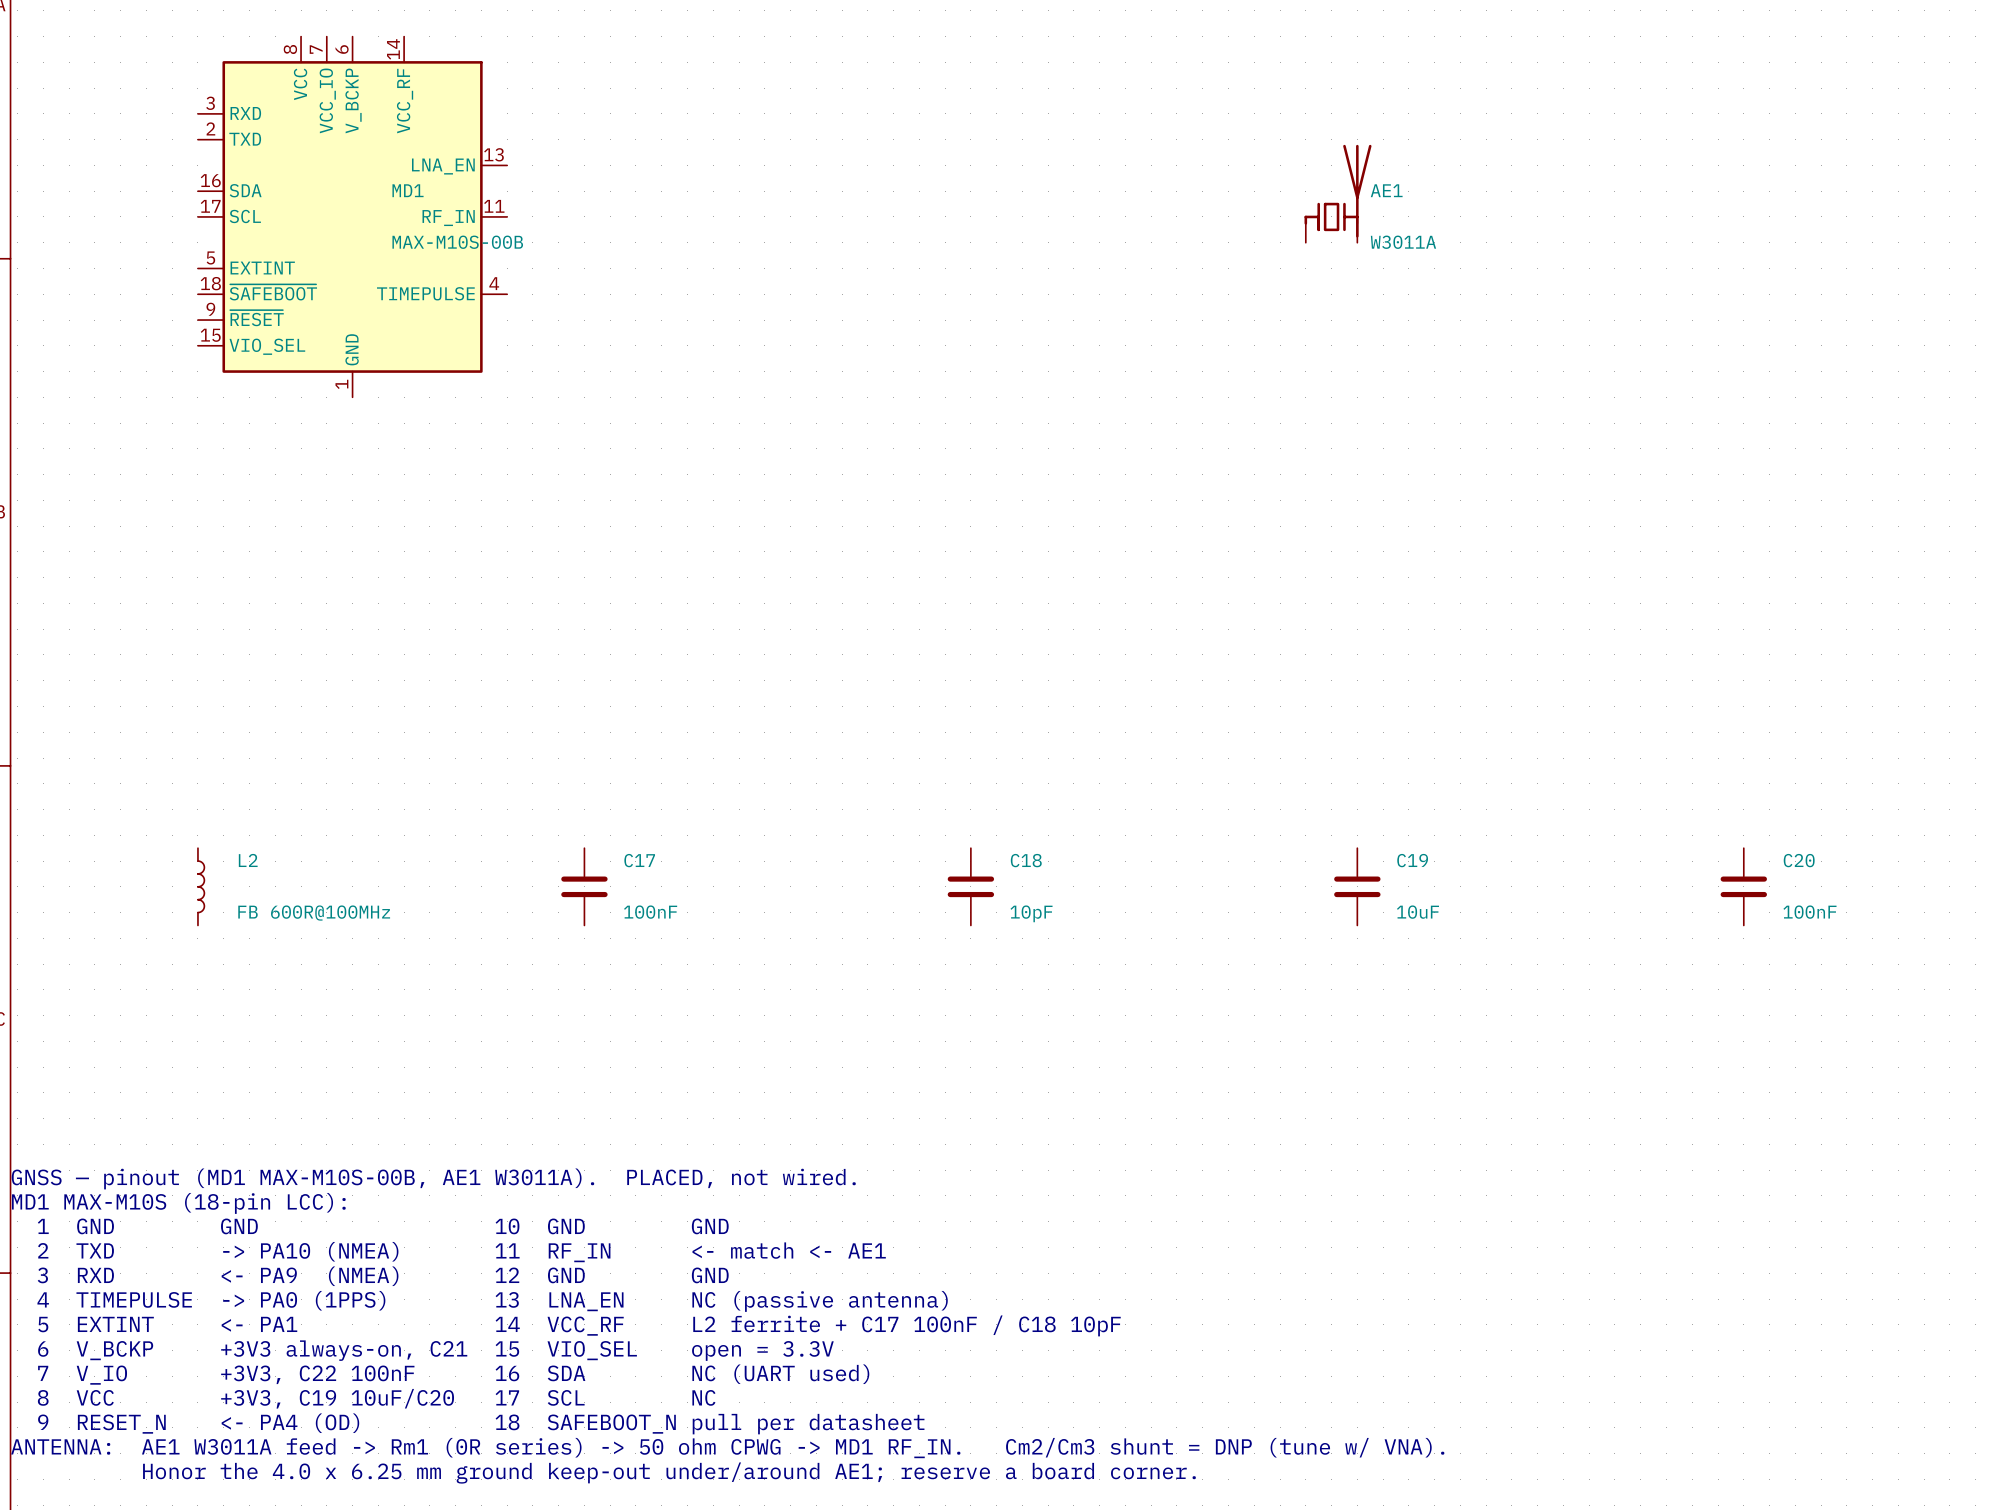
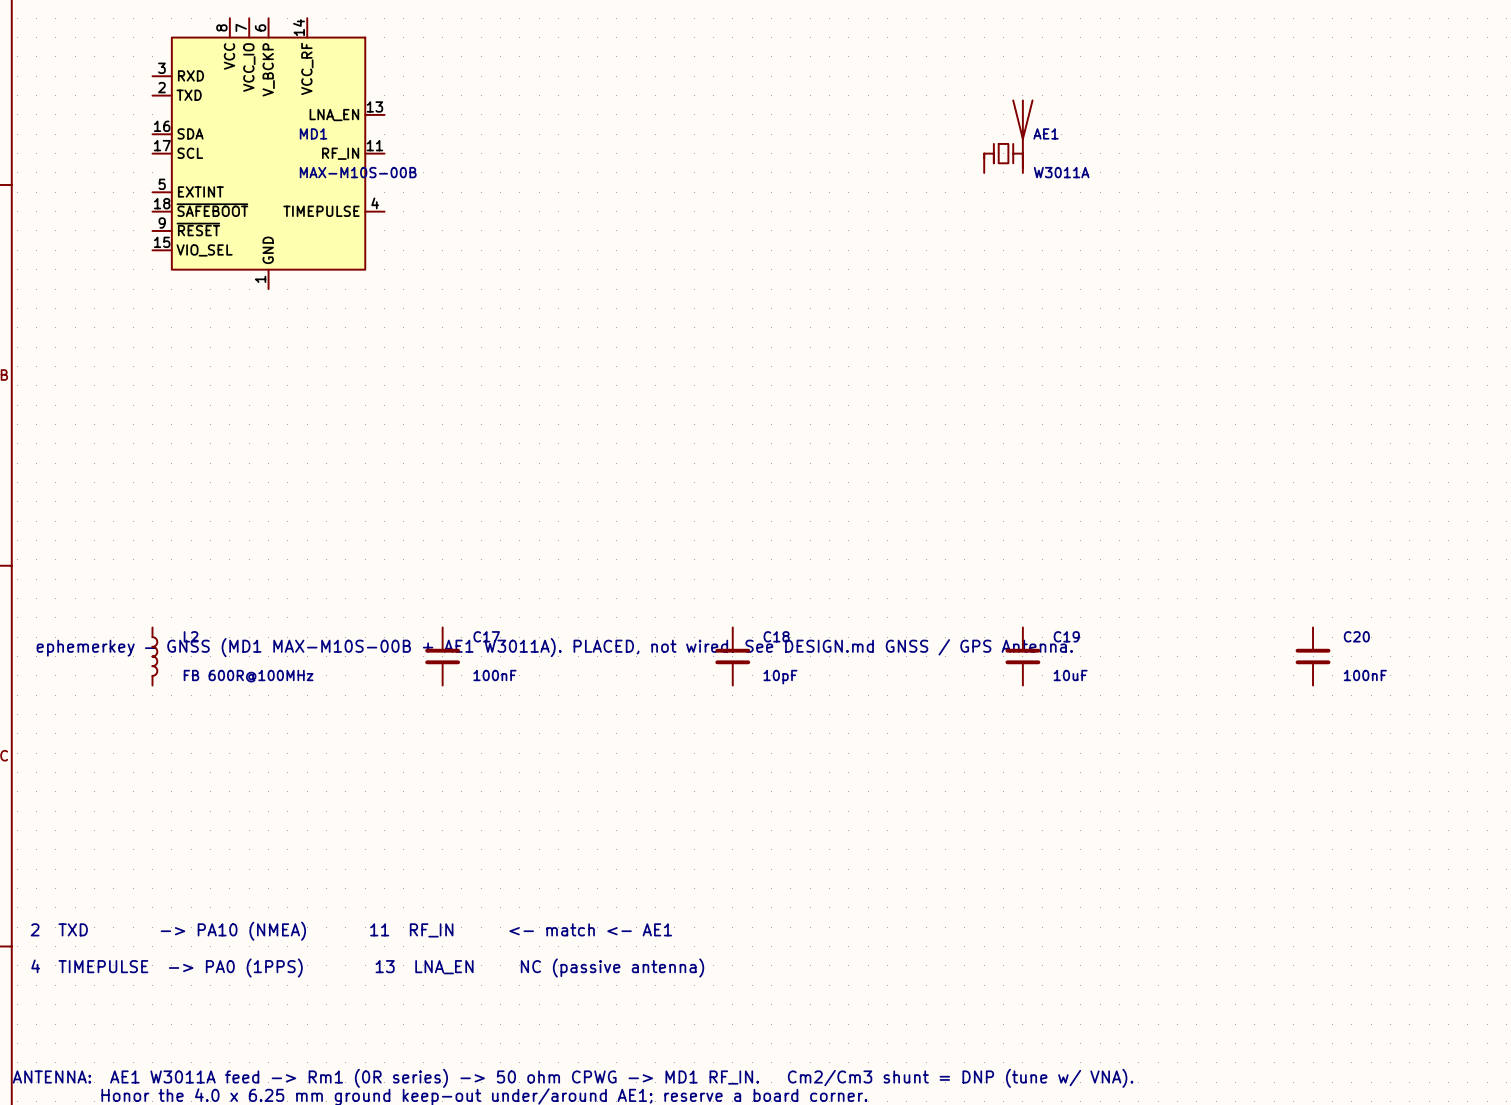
text: none -> ephemerkey — GNSS (MD1 MAX-M10S-00B + AE1 W3011A). PLACED, not wired. See DESIGN.md GNSS / GPS Antenna. (554, 647)
text: GNSS — pinout (MD1 MAX-M10S-00B, AE1 W3011A). PLACED, not wired. (433, 1178) -> none
text: MD1 MAX-M10S (18-pin LCC): (178, 1203) -> none
text: 1 GND GND 10 GND GND (383, 1226) -> none
text: 3 RXD <- PA9 (NMEA) 12 GND GND (383, 1276) -> none
text: 5 EXTINT <- PA1 14 VCC_RF L2 ferrite + C17 100nF / C18 10pF (579, 1325) -> none
text: 6 V_BCKP +3V3 always-on, C21 15 VIO_SEL open = 3.3V (435, 1350) -> none
text: 7 V_IO +3V3, C22 100nF 16 SDA NC (UART used) (453, 1374) -> none
text: 8 VCC +3V3, C19 10uF/C20 17 SCL NC (376, 1398) -> none
text: 9 RESET_N <- PA4 (OD) 18 SAFEBOOT_N pull per datasheet (481, 1423) -> none

